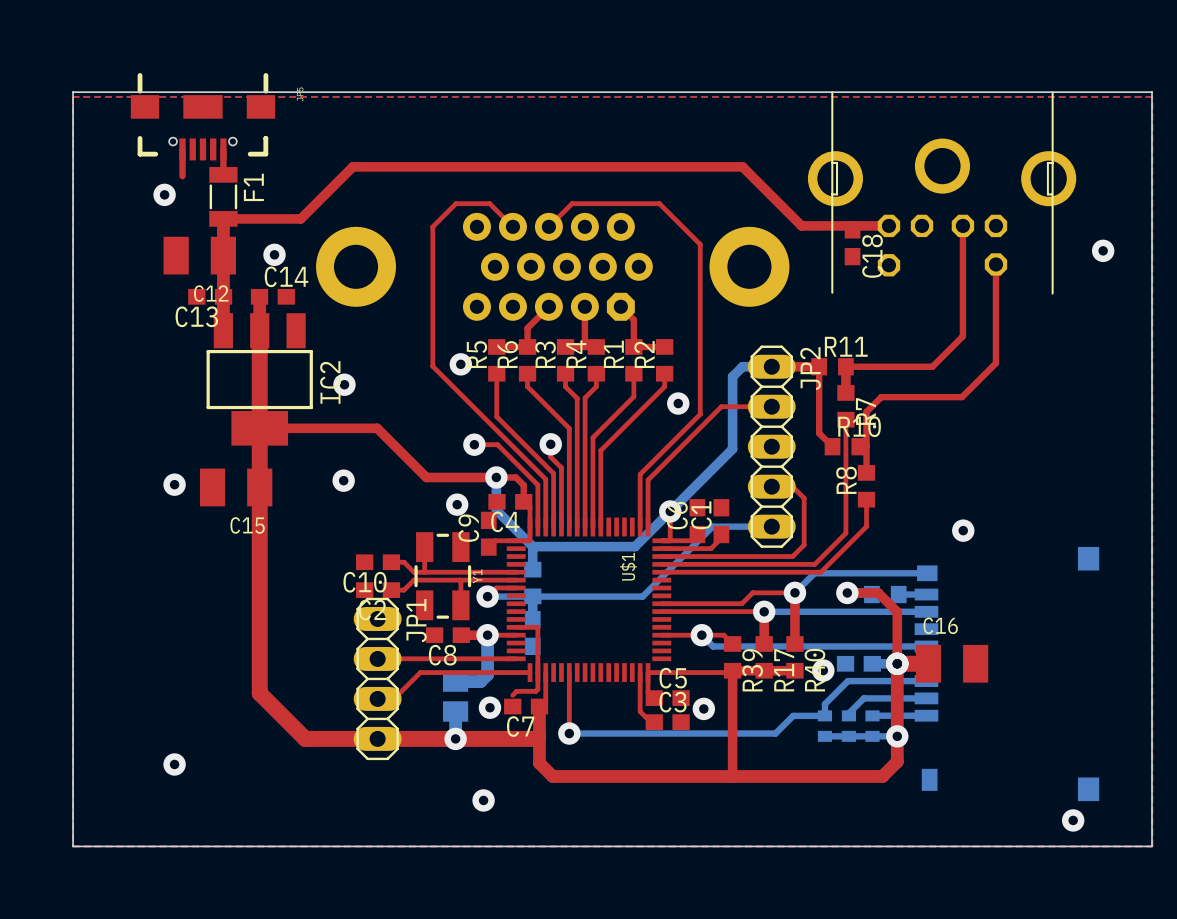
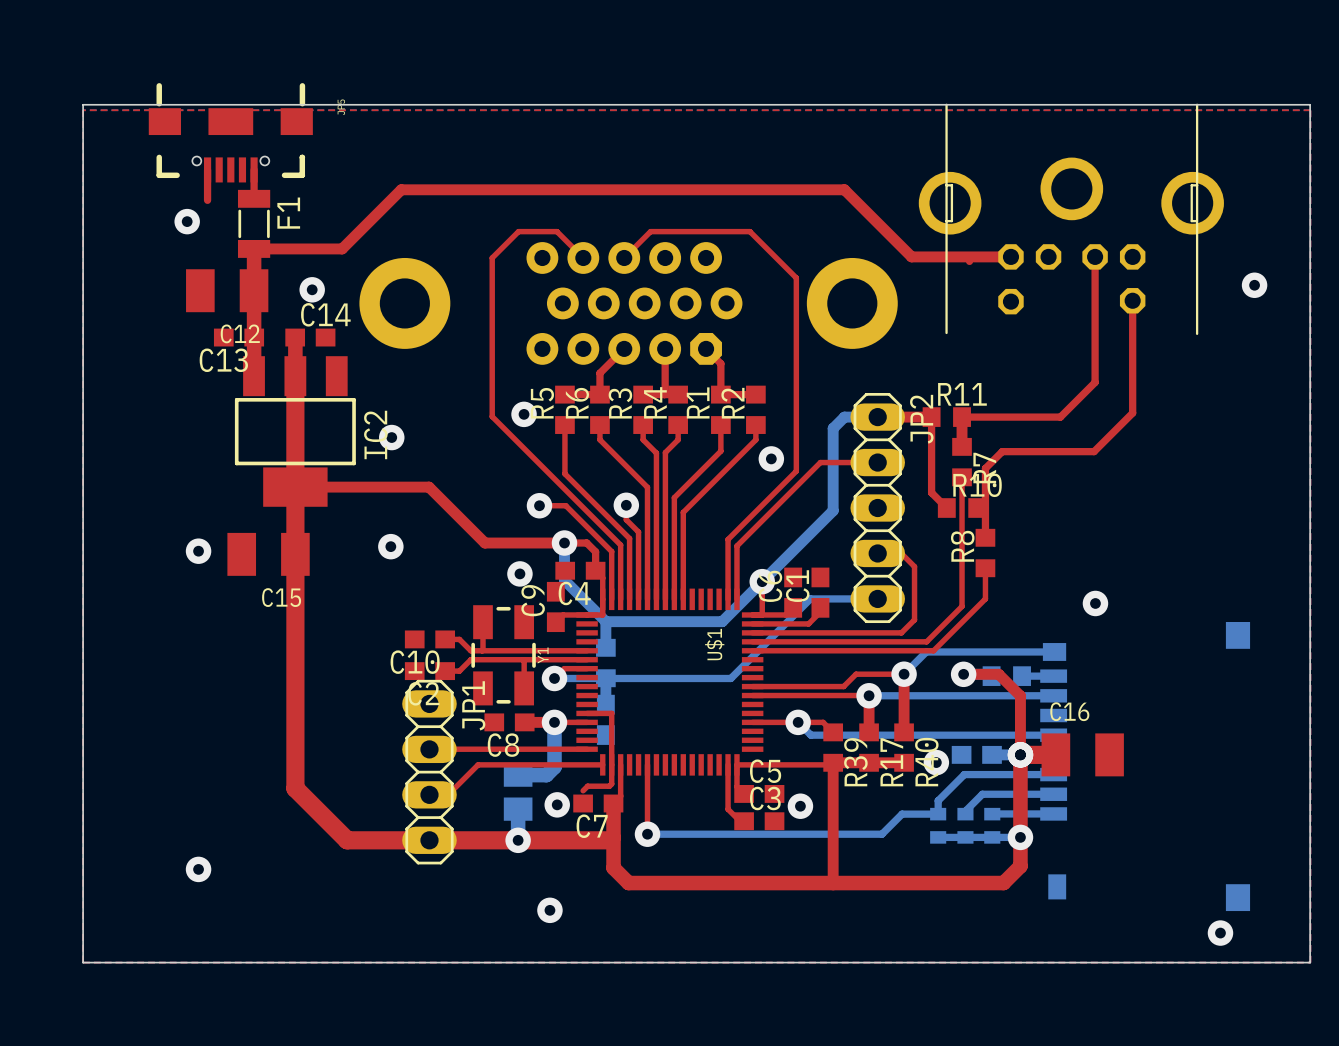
C18: (852, 243) -> none

